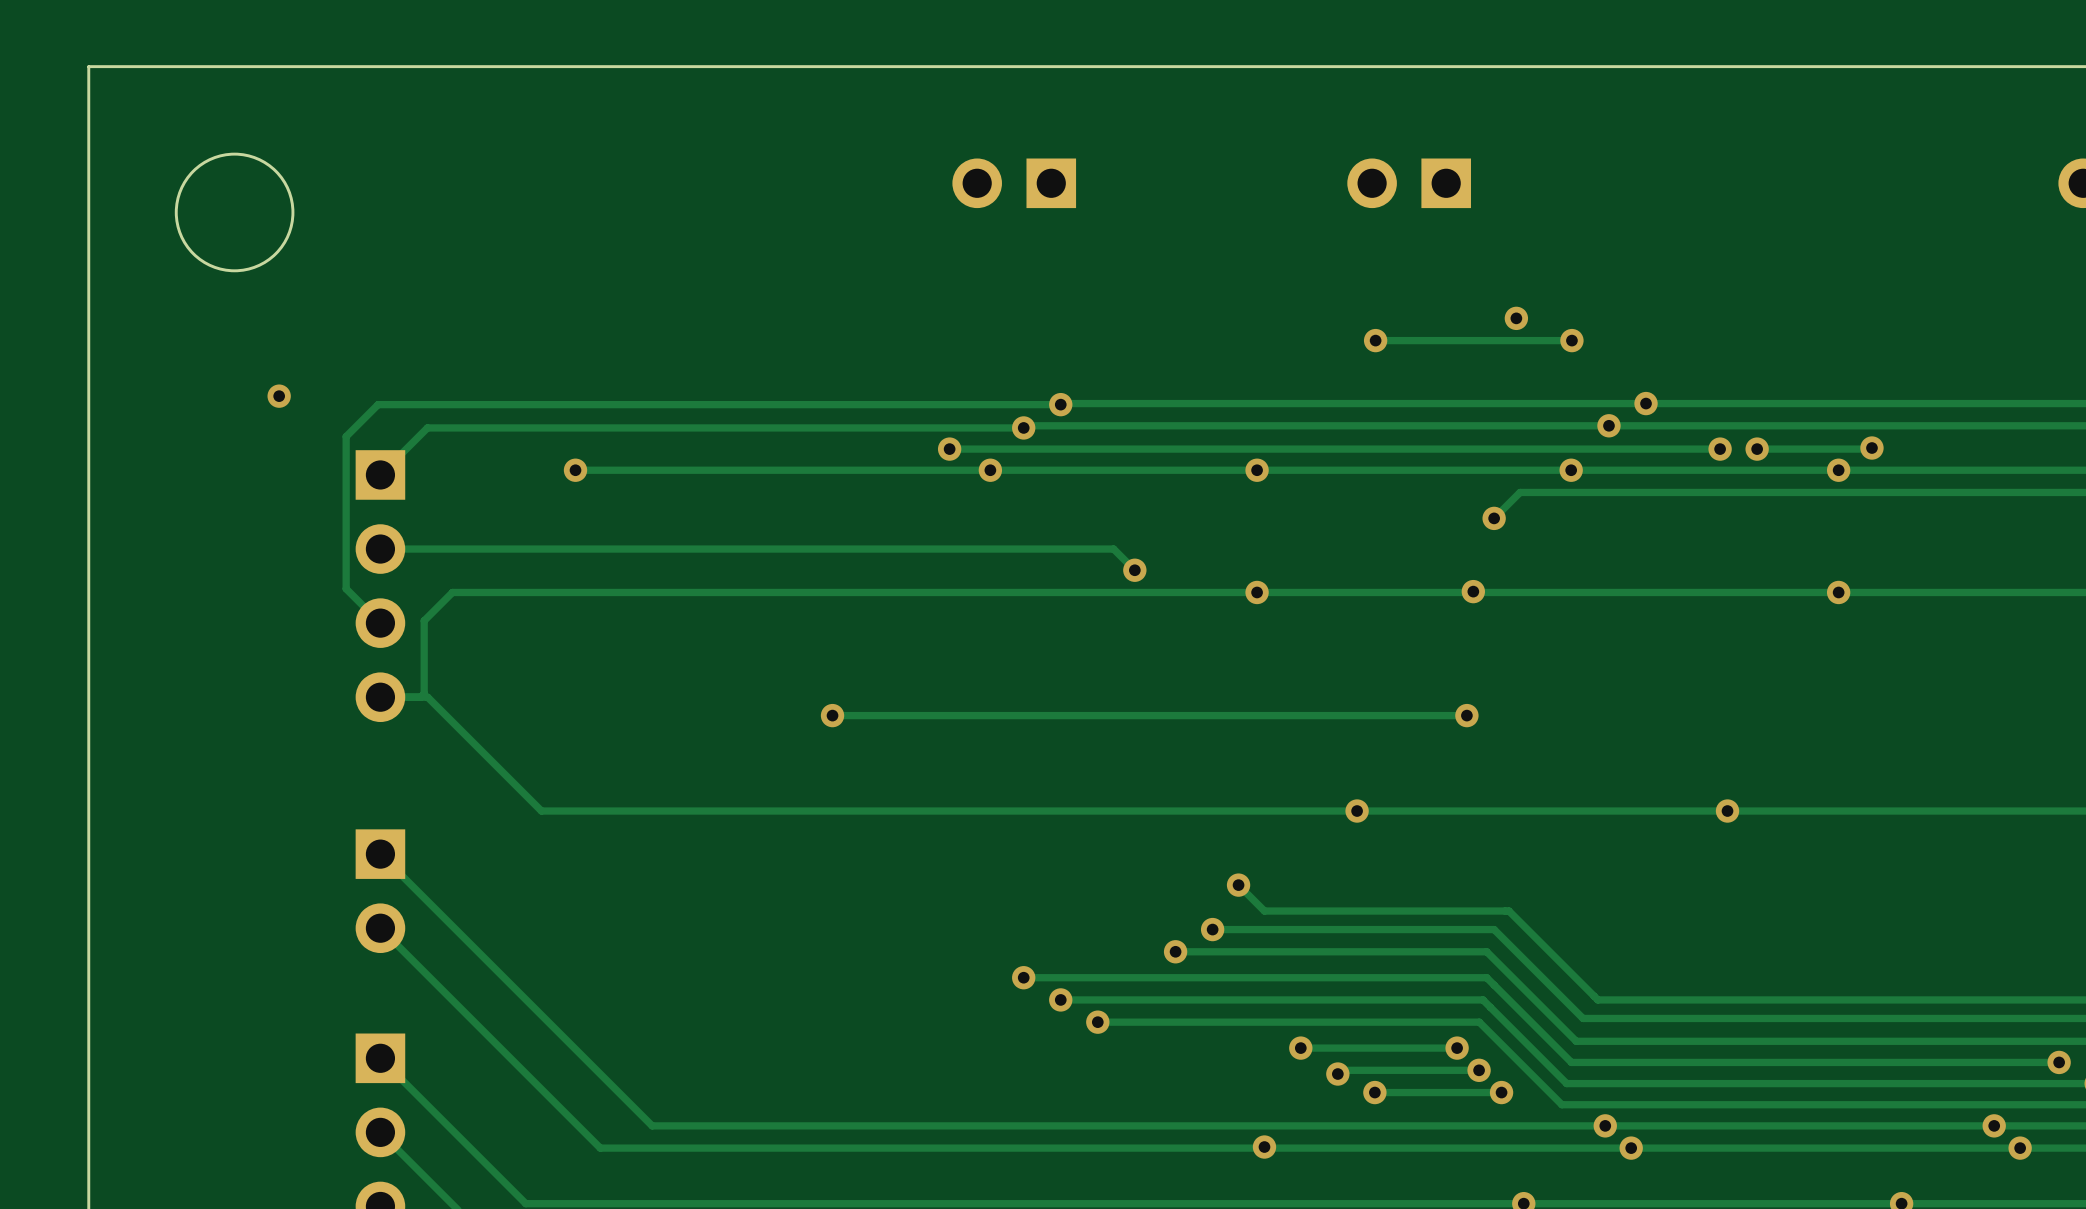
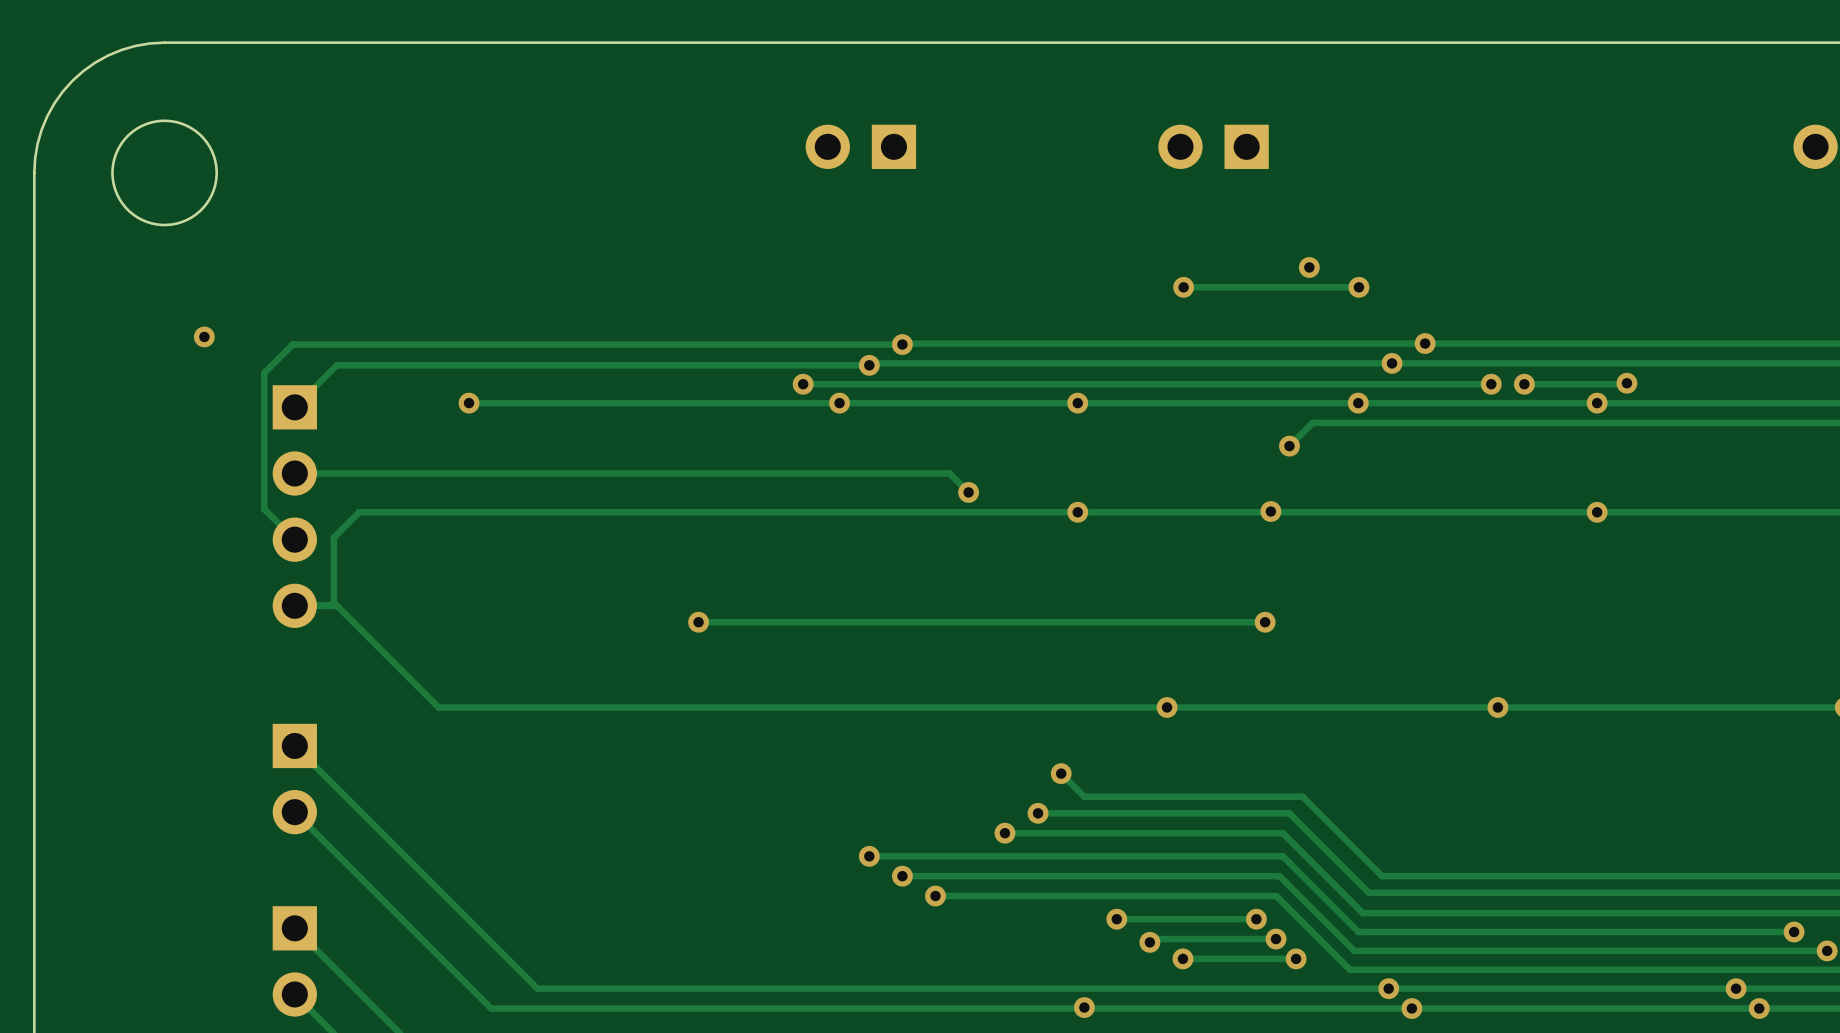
board edge: (234, 66) (88, 66) (88, 212) -> (164, 42) (149, 43) (121, 49) (95, 62) (72, 80) (54, 103) (41, 129) (35, 158) (34, 172)

